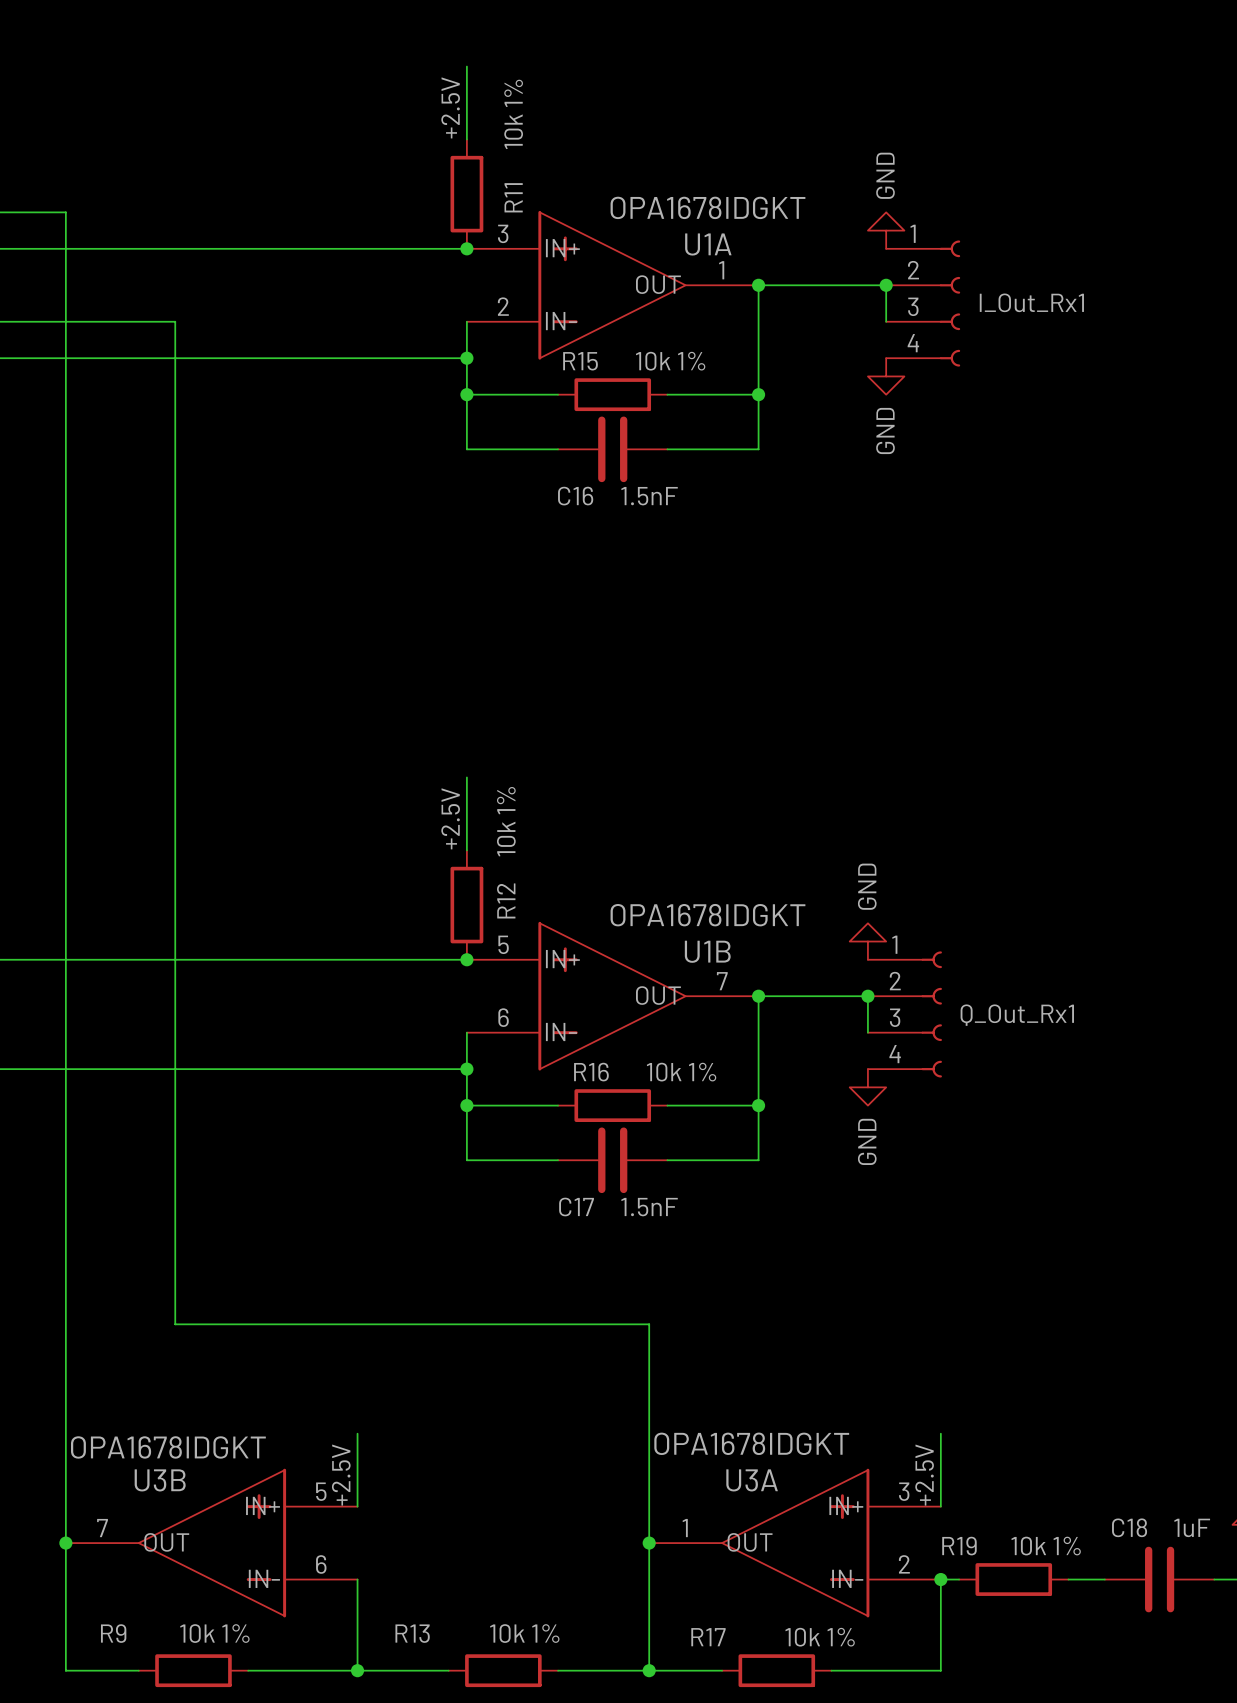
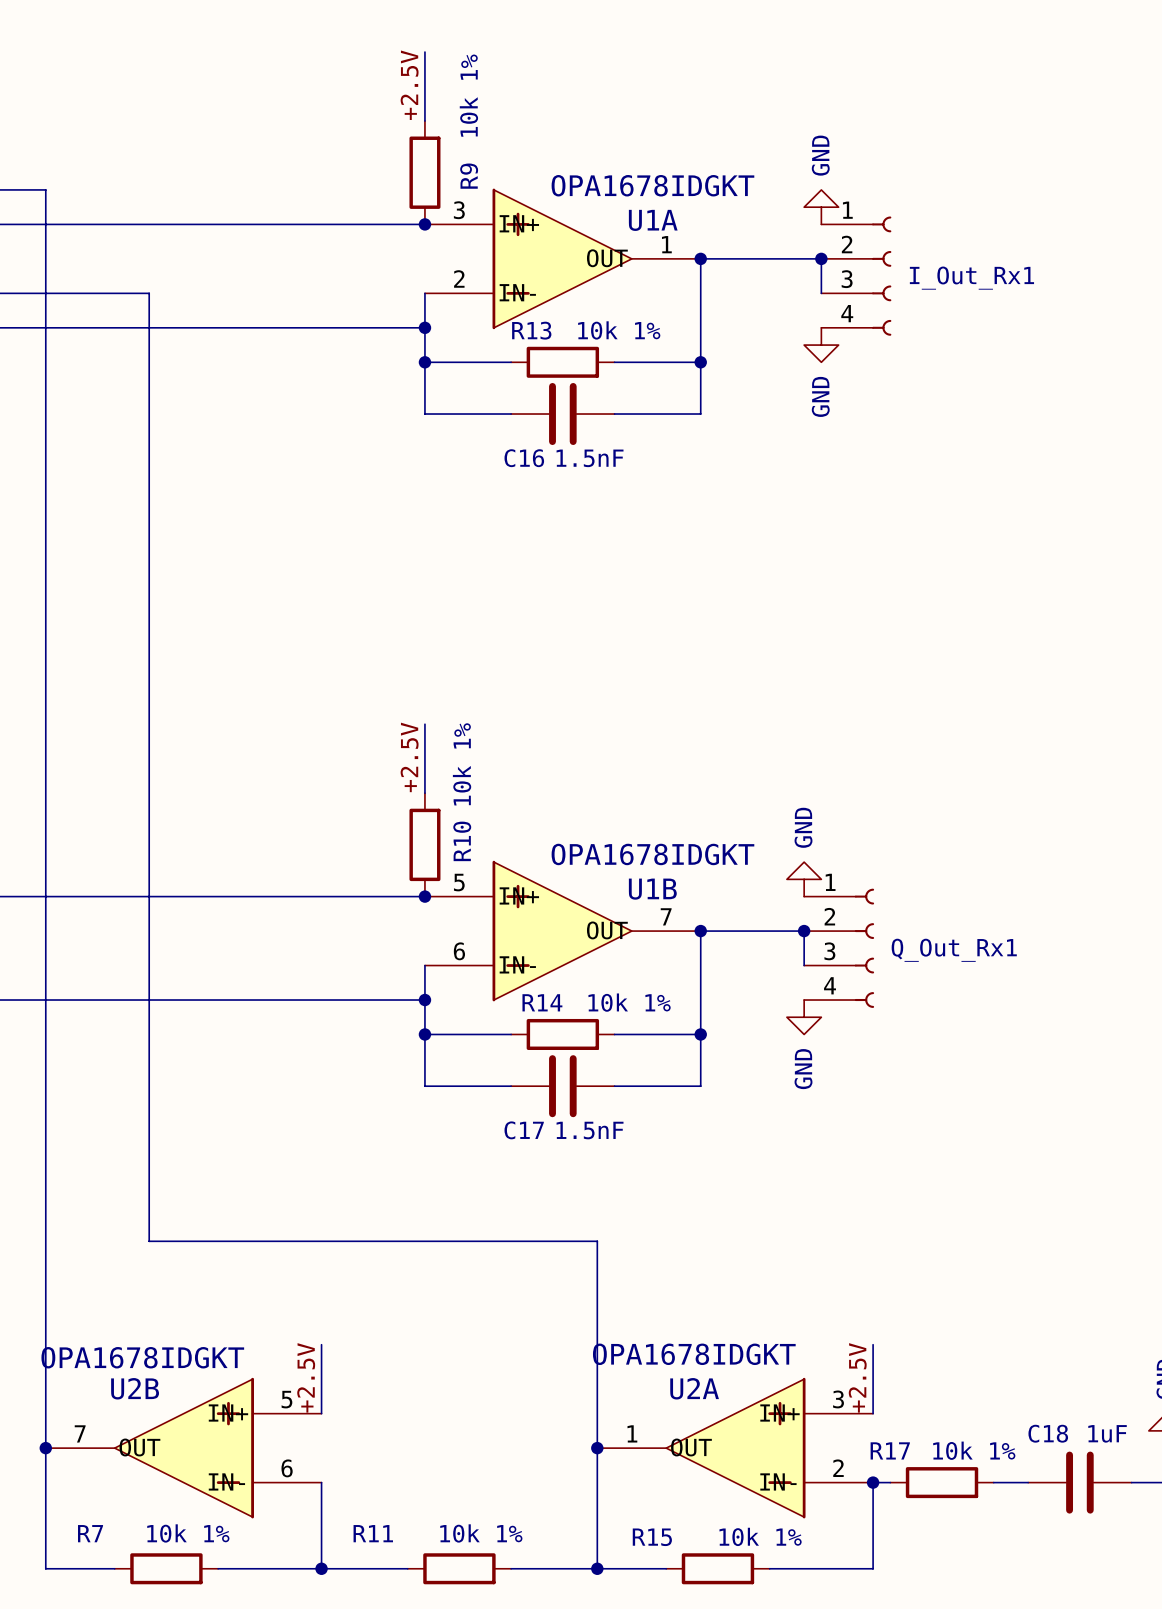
R11 name: R11 (513, 197) -> R9 (469, 176)
R15 name: R15 (580, 361) -> R13 (531, 330)
R12 name: R12 (506, 900) -> R10 (462, 841)
R16 name: R16 (591, 1072) -> R14 (542, 1002)
U3B name: U3B (160, 1480) -> U2B (135, 1388)
U3A name: U3A (752, 1480) -> U2A (694, 1388)
R19 name: R19 (959, 1546) -> R17 (890, 1450)
R9 name: R9 (113, 1633) -> R7 (90, 1533)
R13 name: R13 (412, 1633) -> R11 (373, 1533)
R17 name: R17 (708, 1637) -> R15 (652, 1537)

